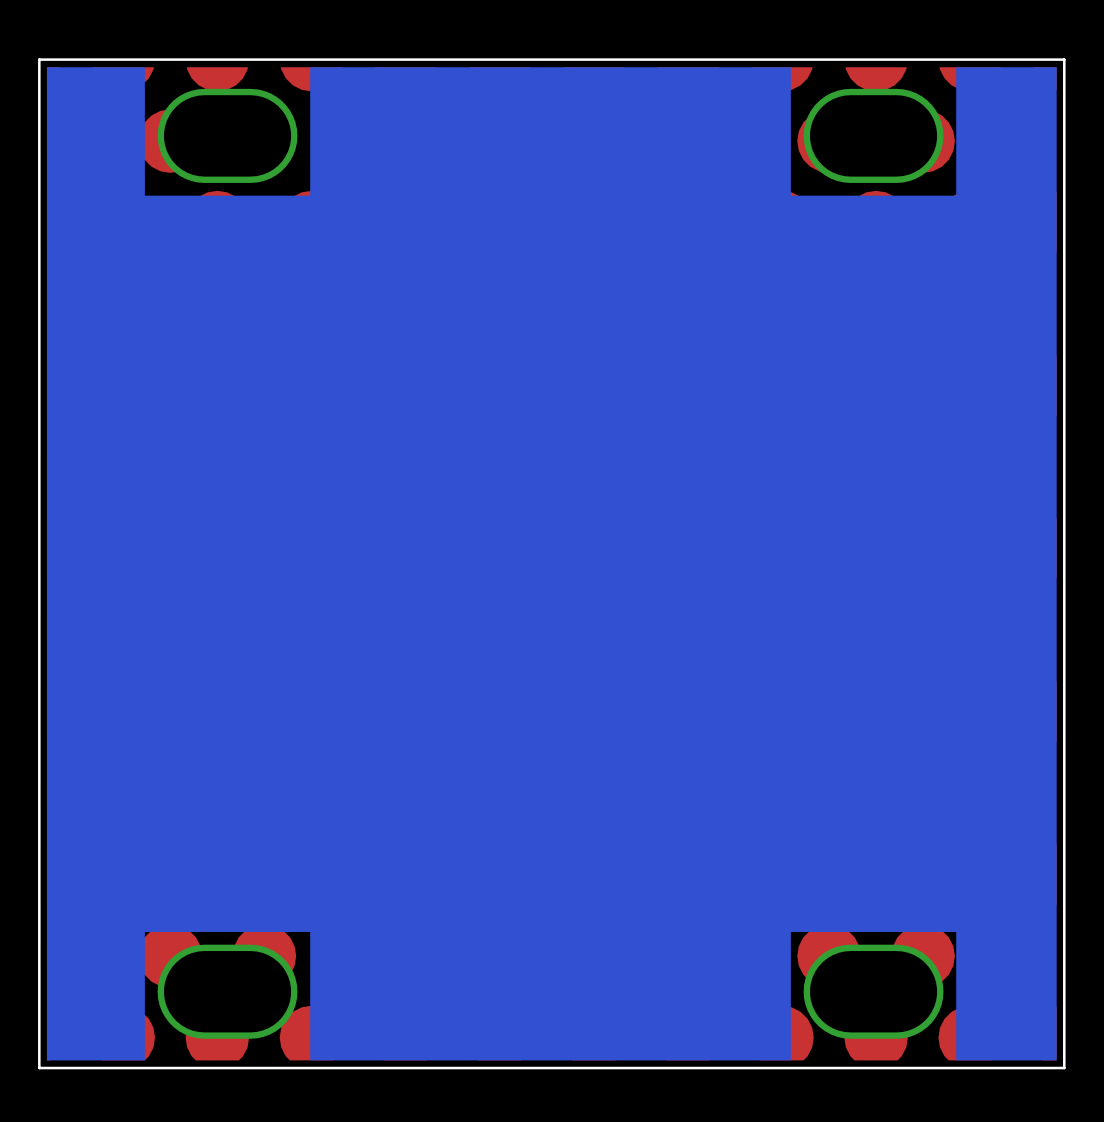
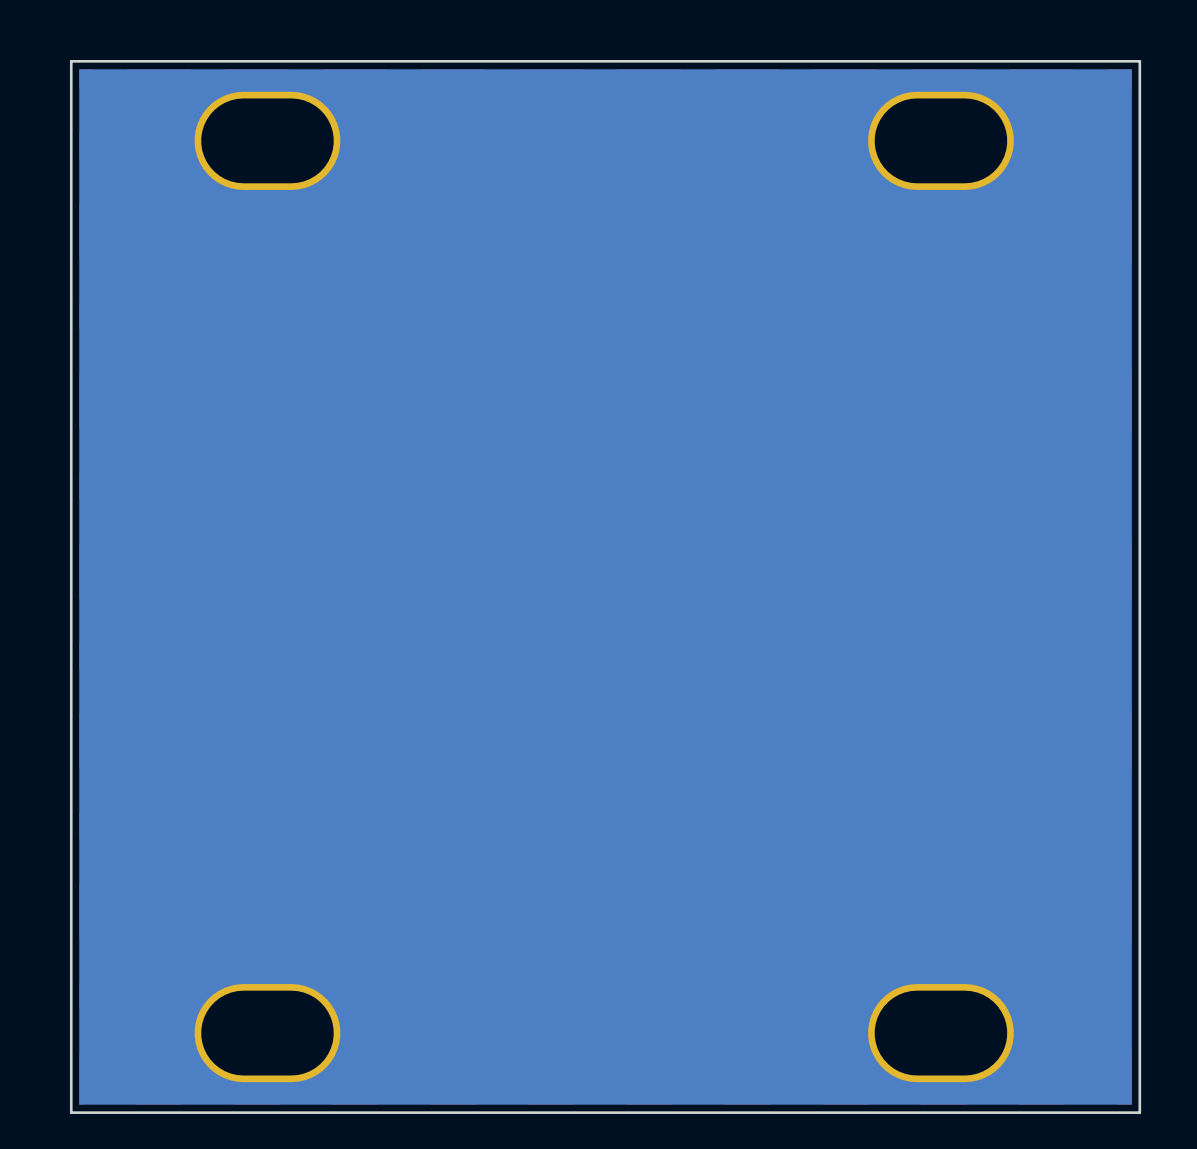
drawing: [46, 67, 145, 1061] -> none
drawing: [310, 67, 791, 196] -> none
drawing: [956, 67, 1057, 1061] -> none
drawing shape: [144, 195, 957, 932] -> [79, 69, 1132, 1105]
drawing: [310, 931, 791, 1061] -> none

